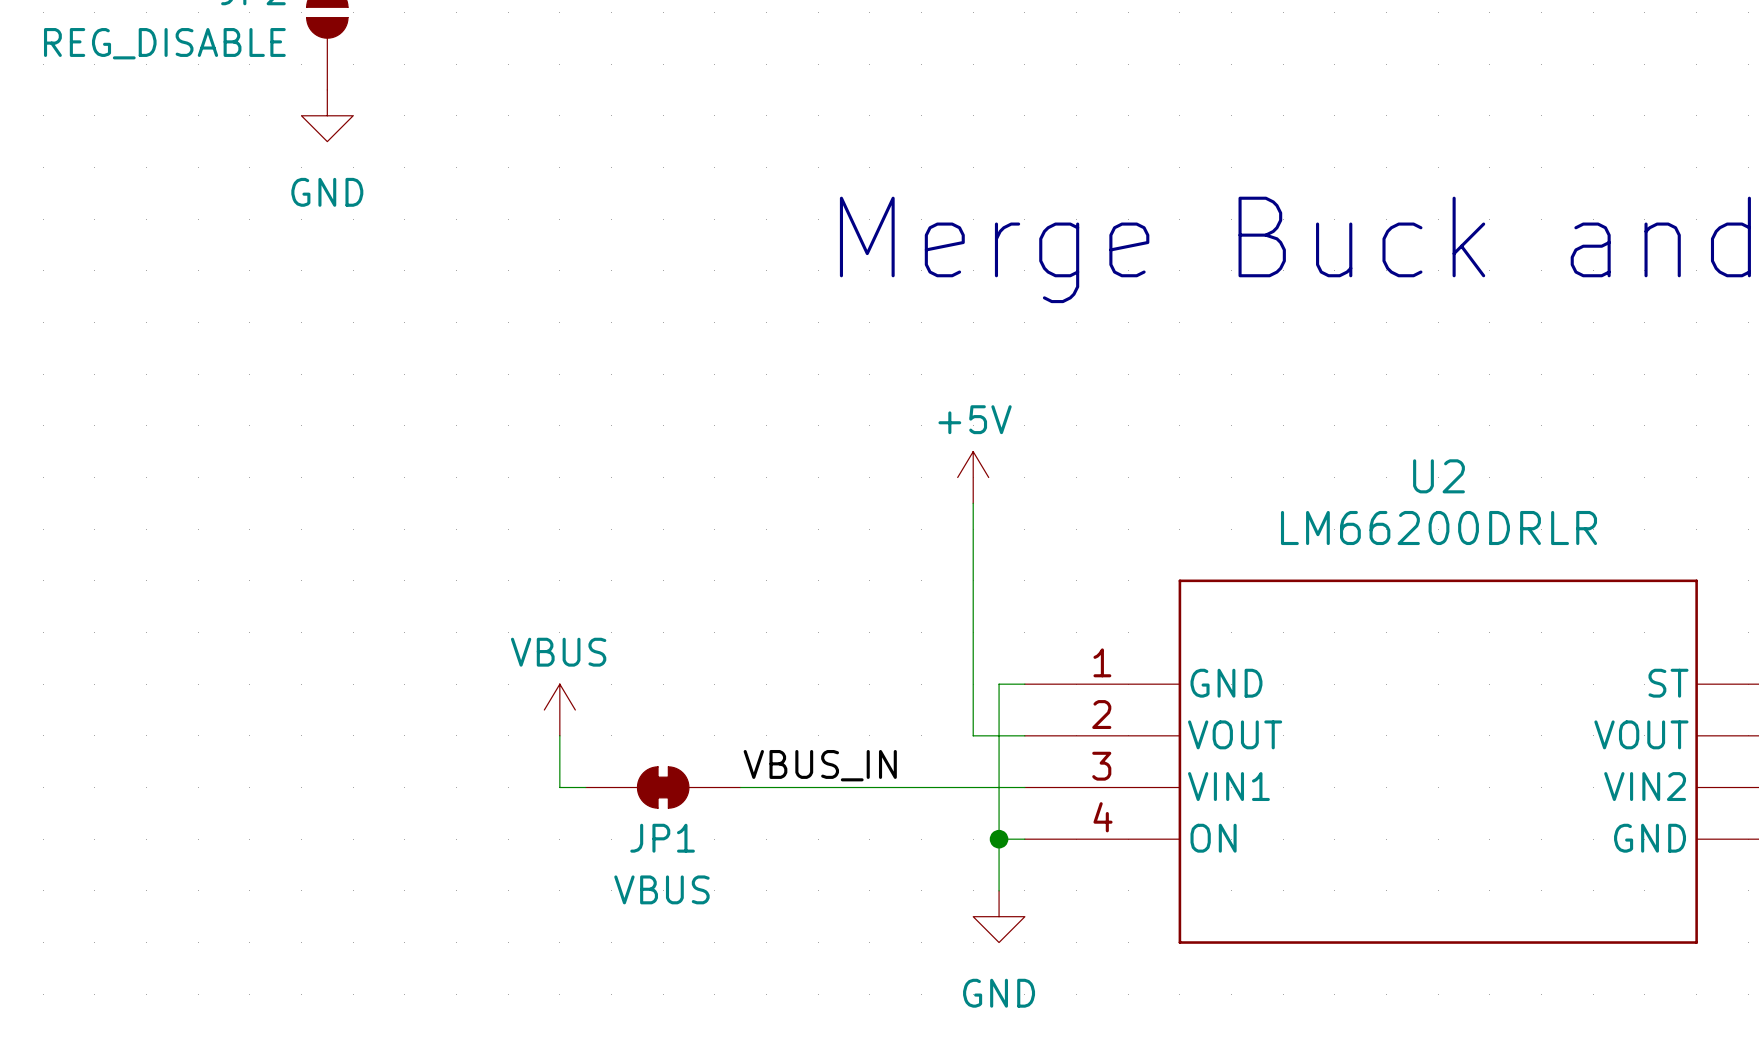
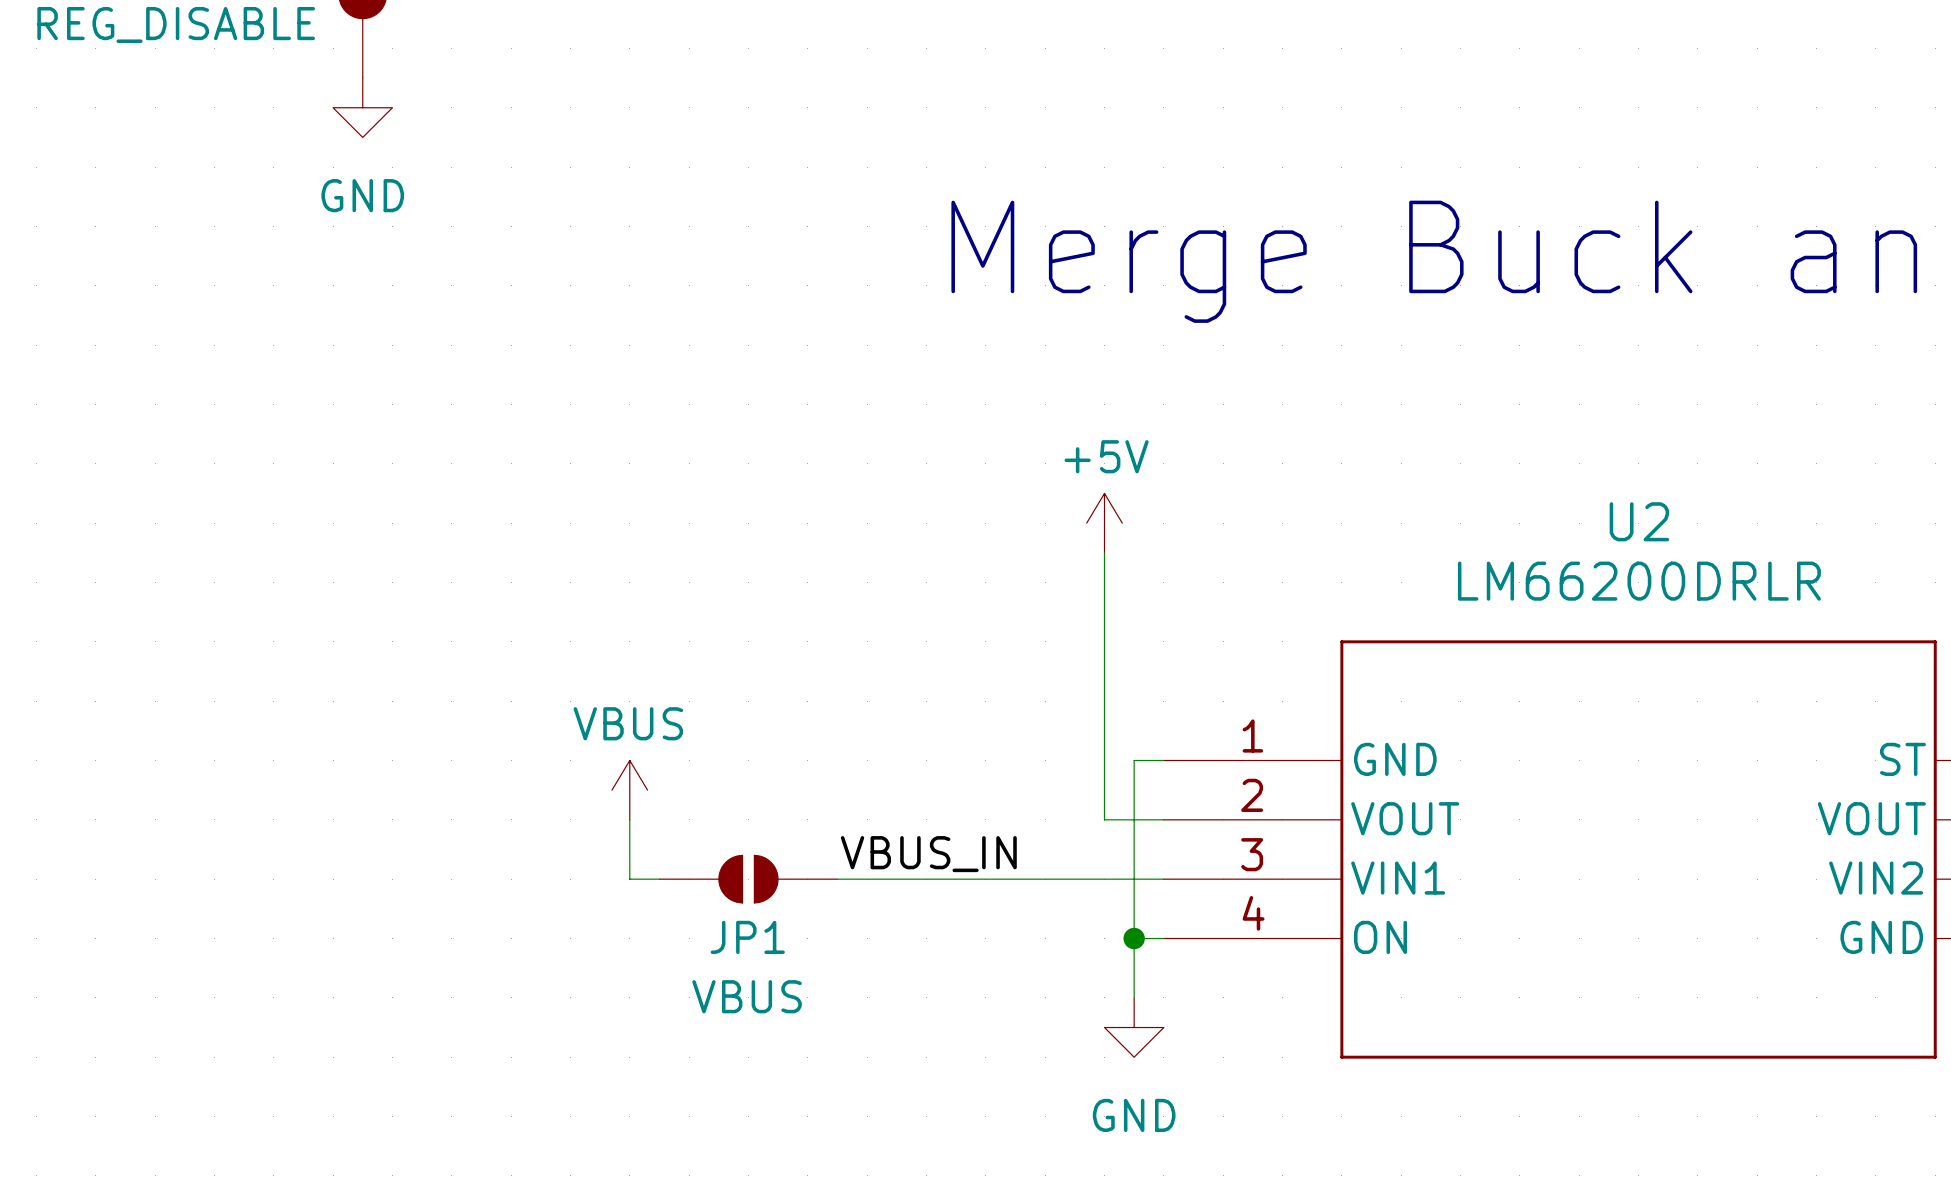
JP1 symbol: [585, 766, 741, 809] -> [659, 855, 838, 903]

